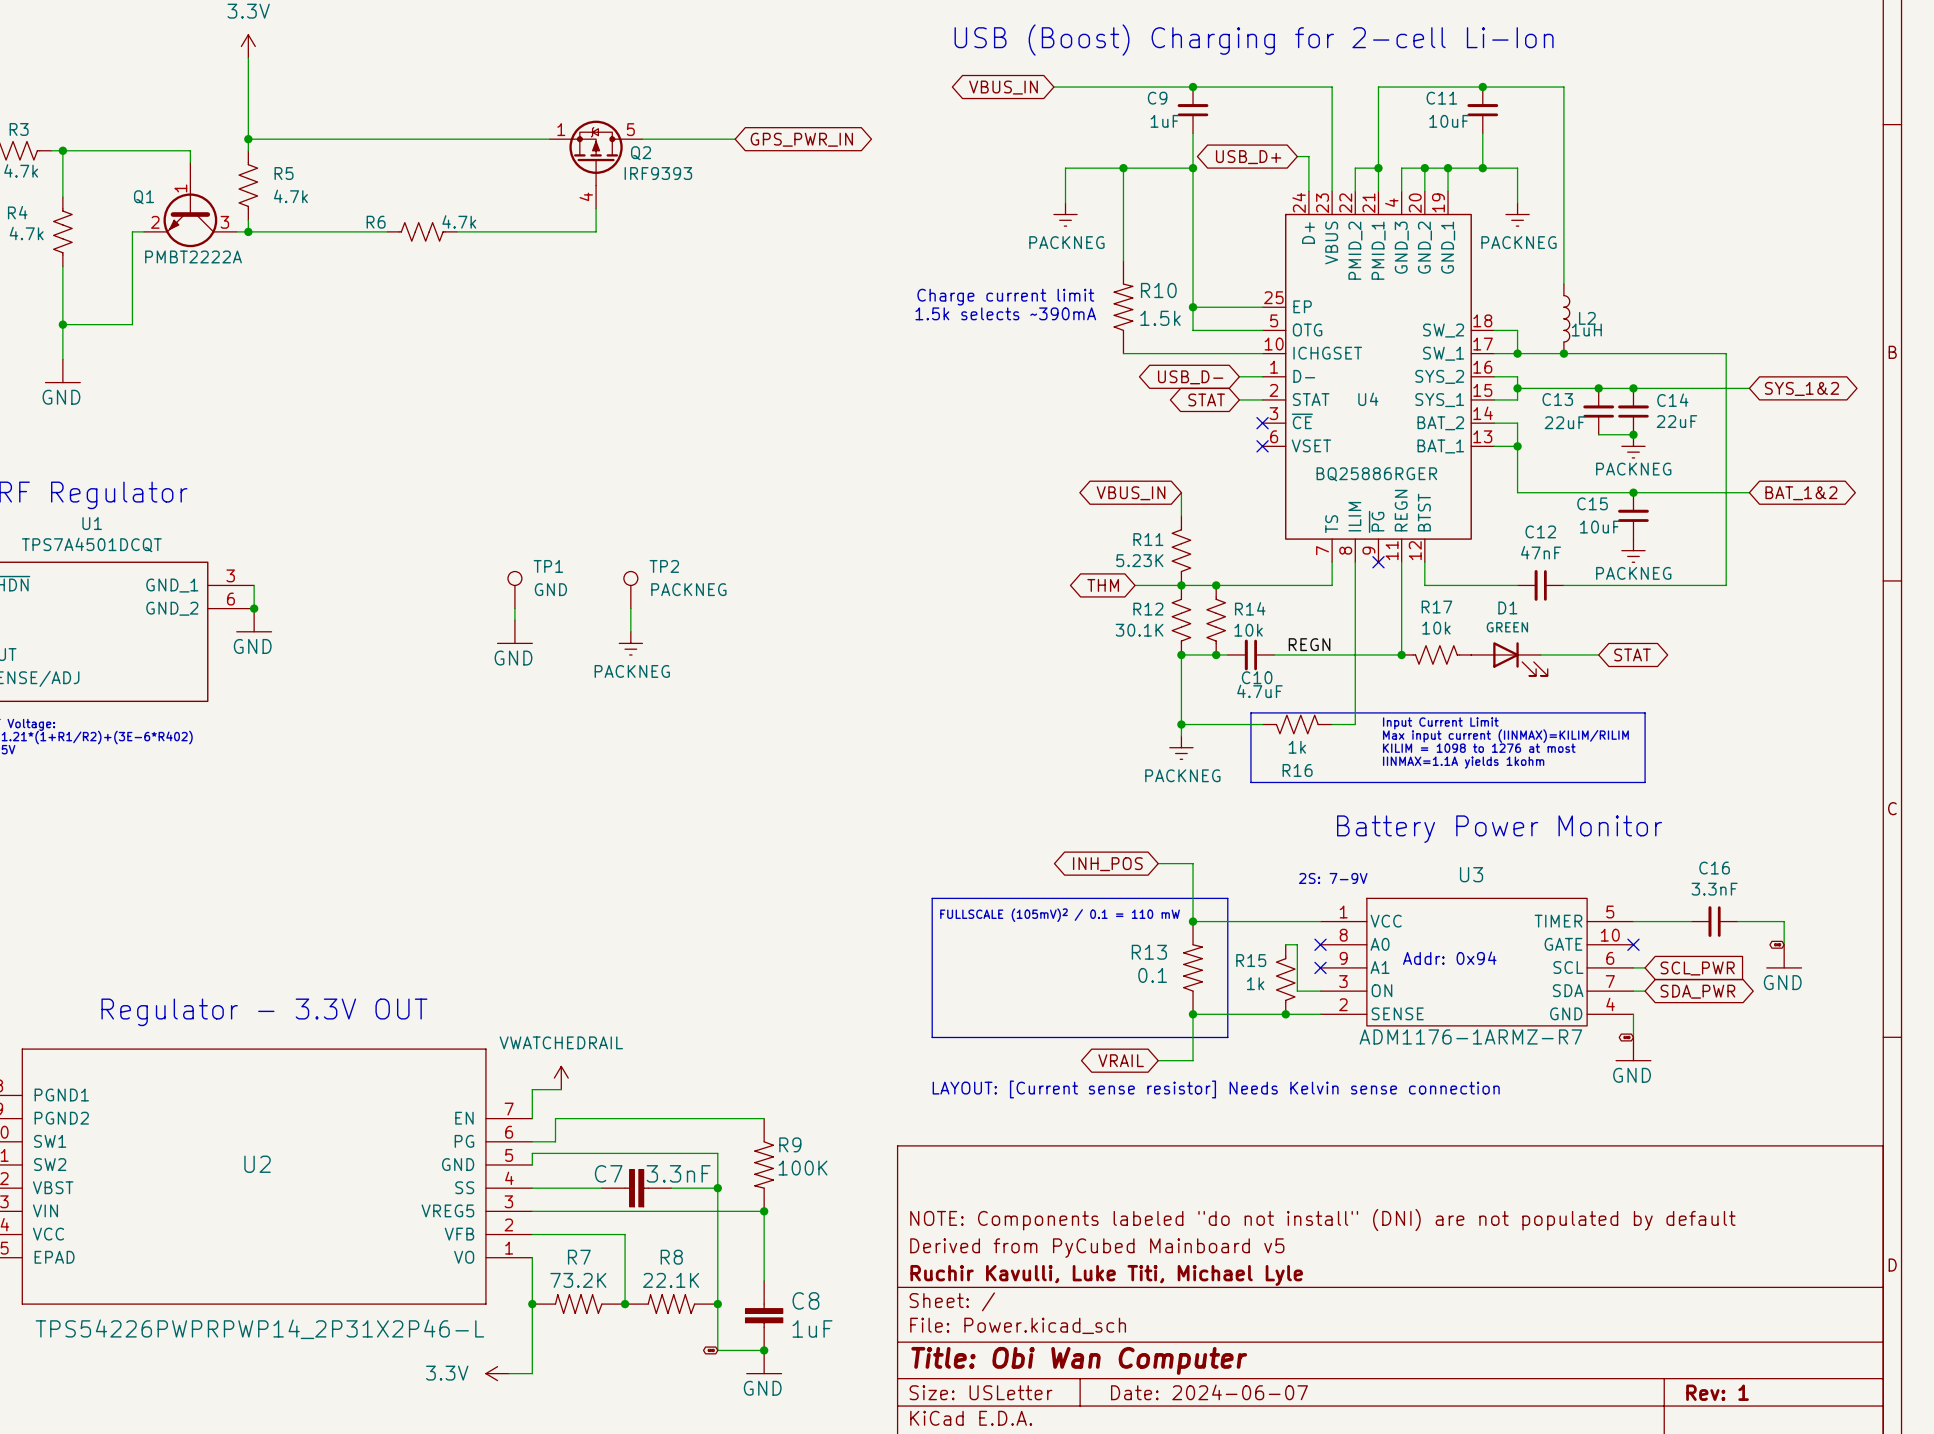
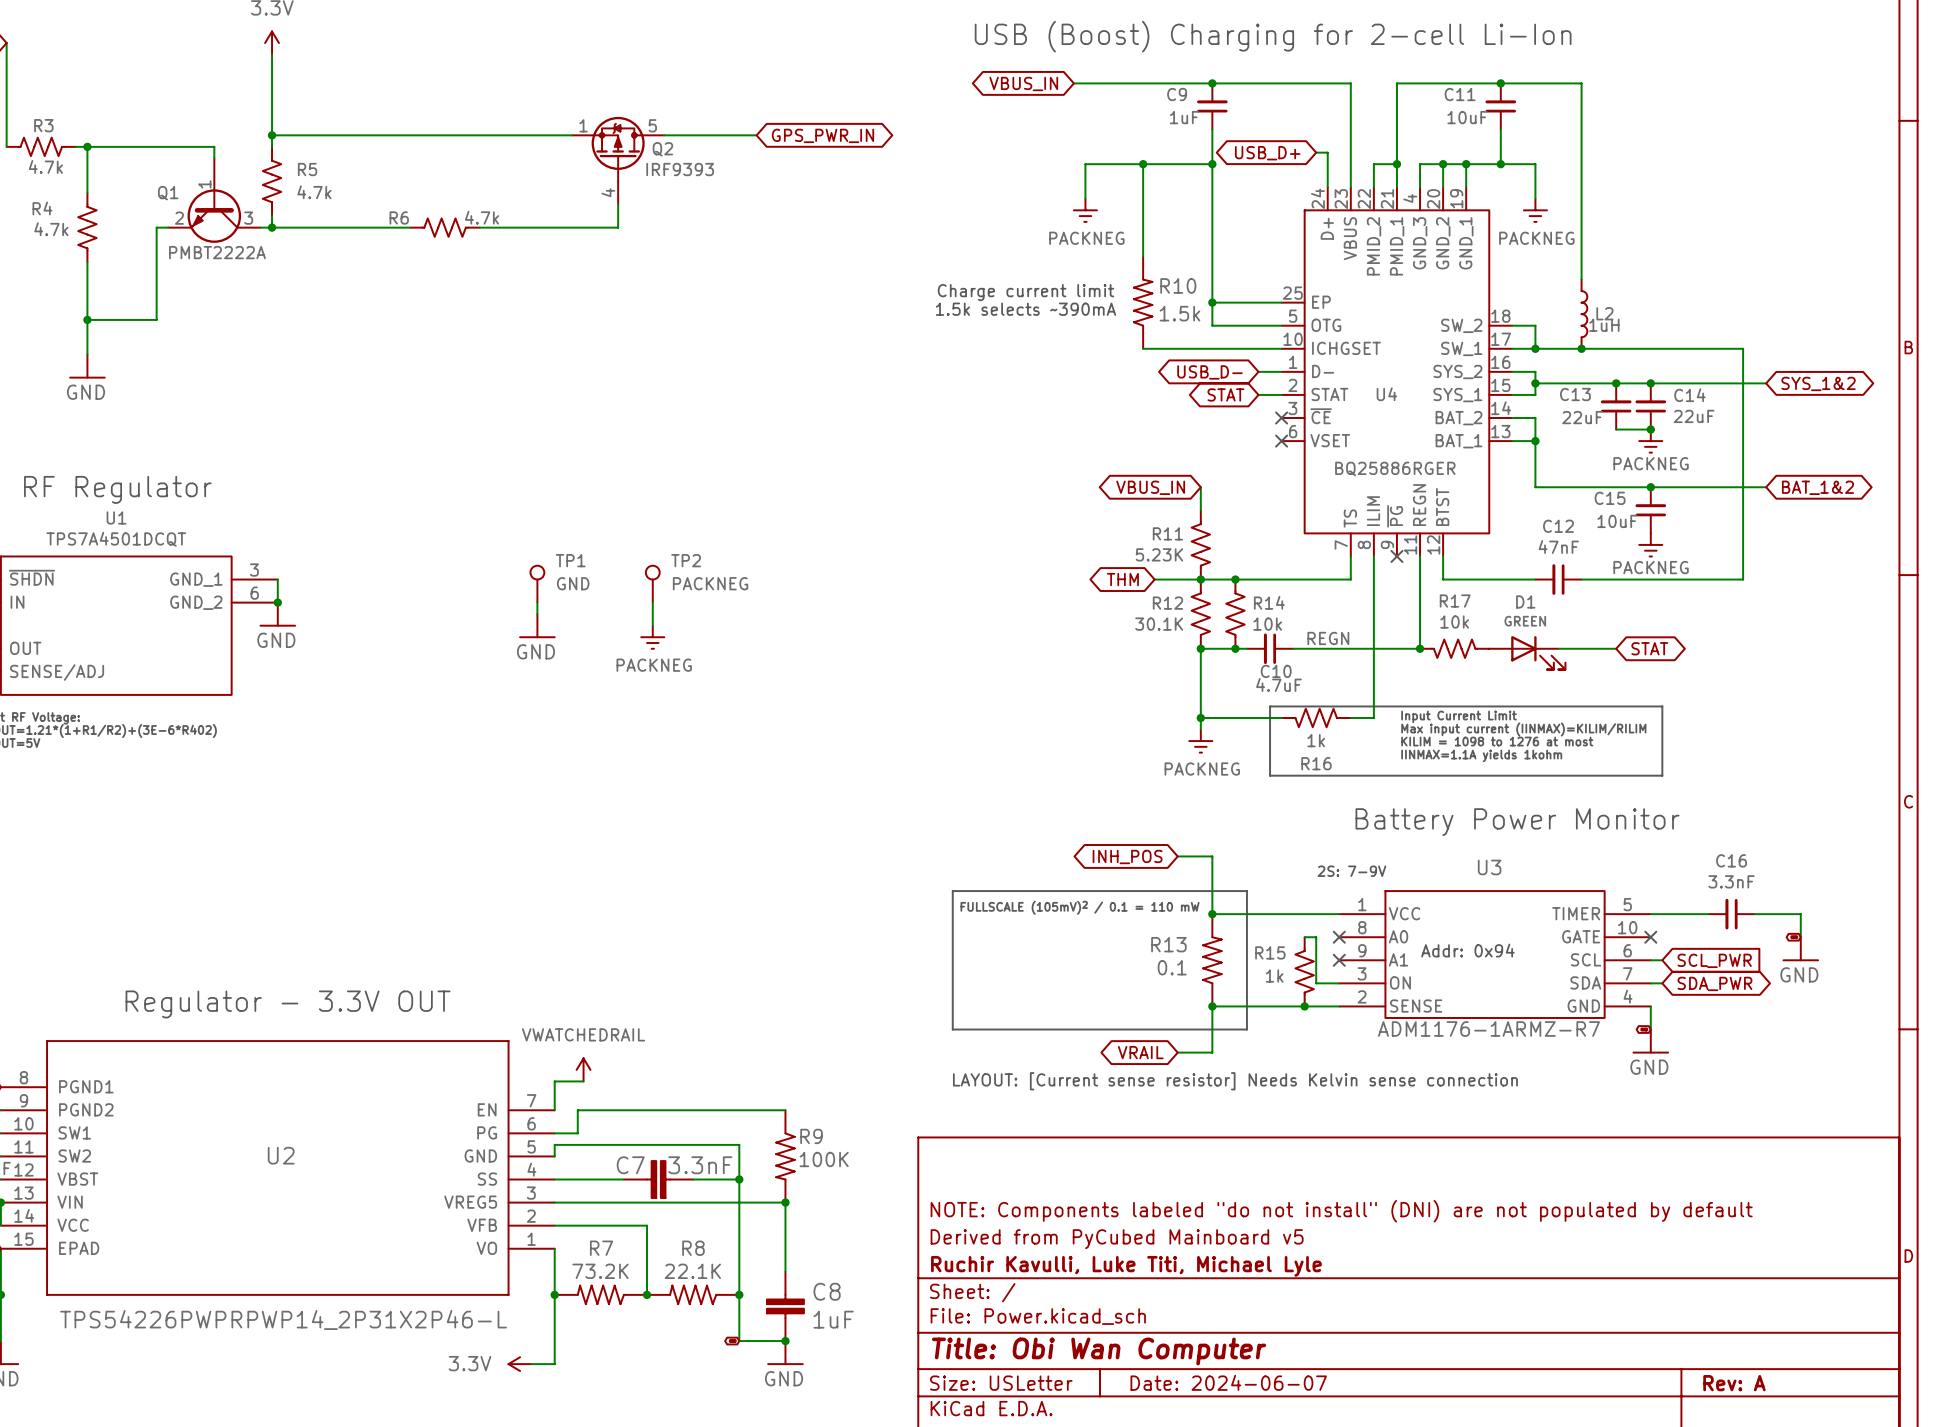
title block: Rev: 1 (1717, 1392) -> Rev: A (1734, 1383)

